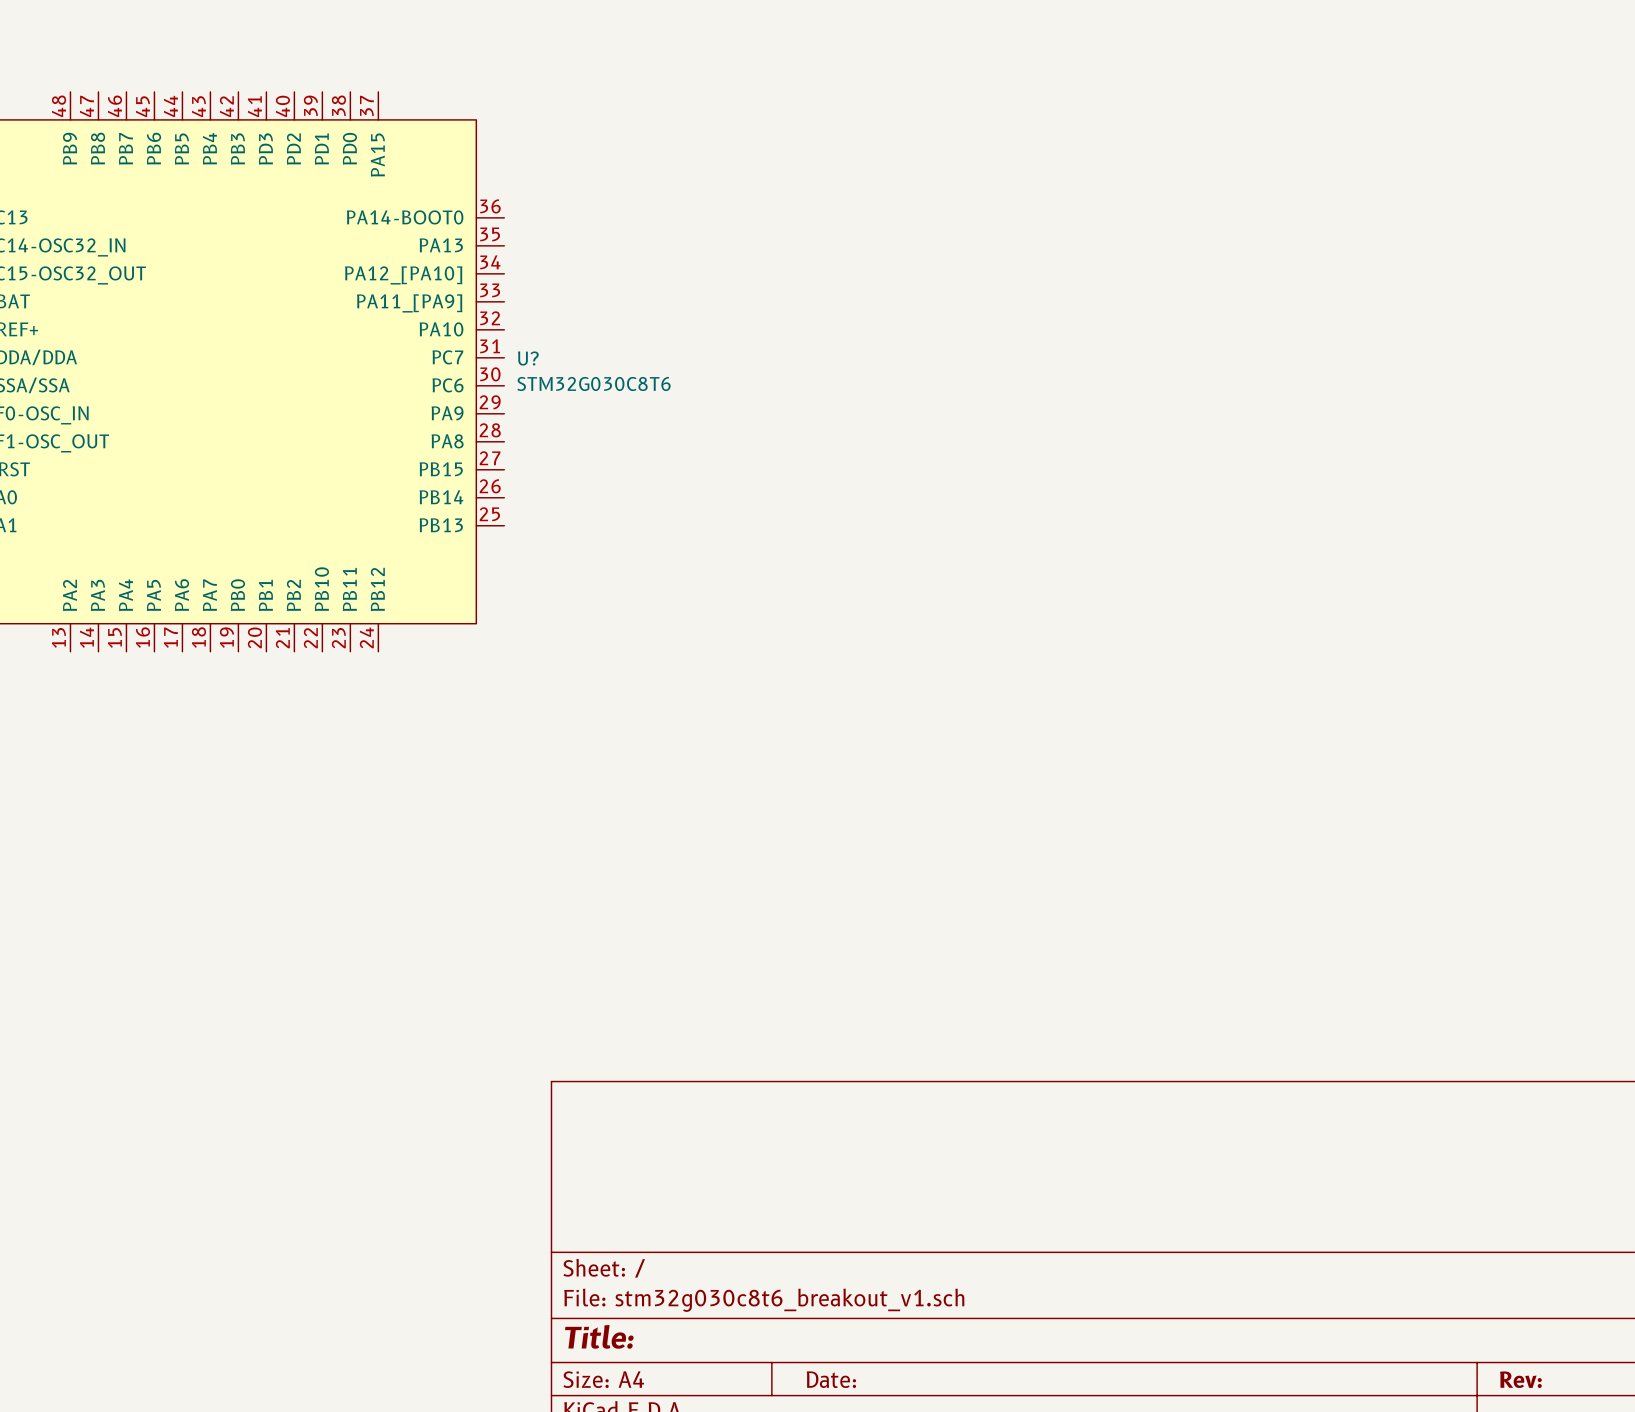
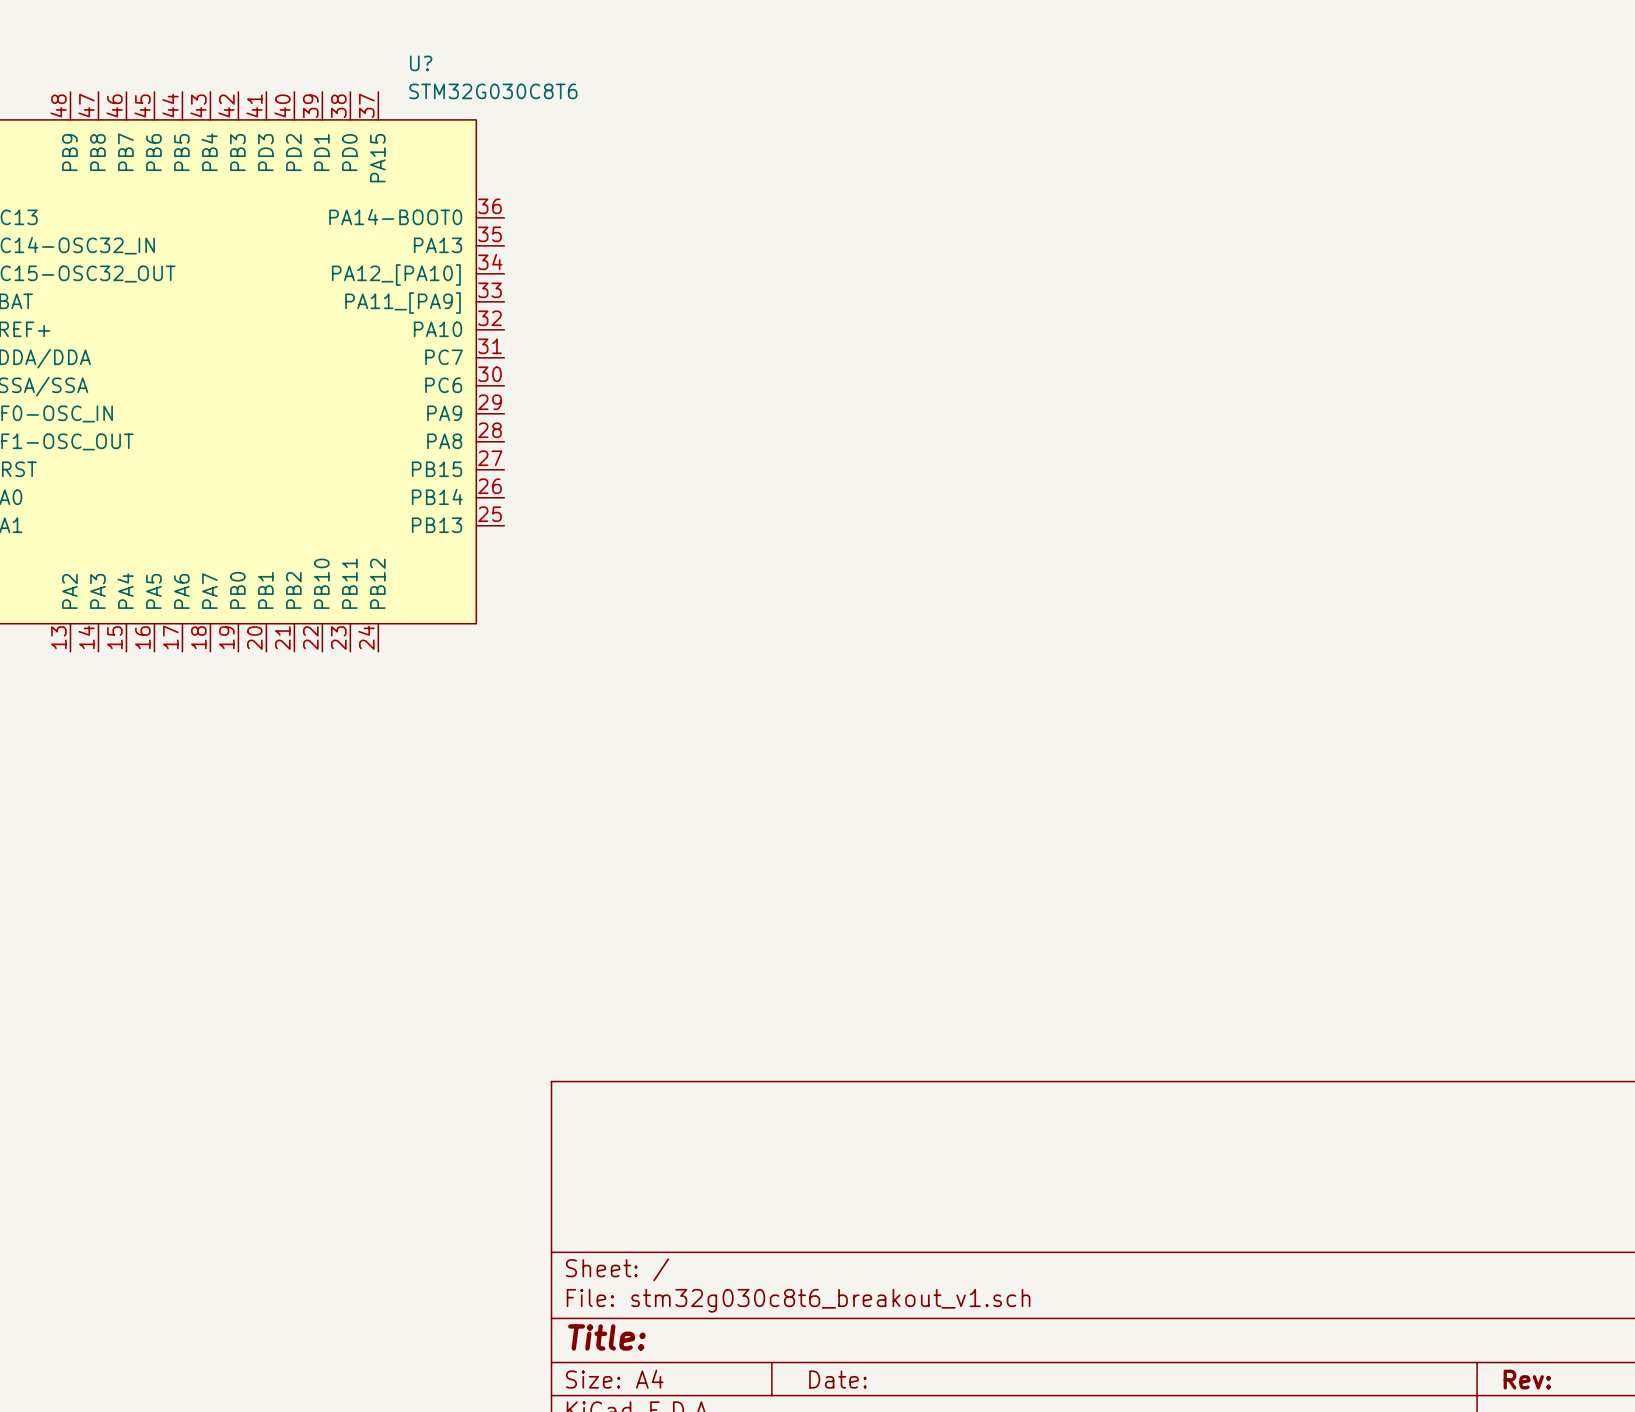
U? name position: U? (528, 358) -> U? (421, 63)
U? value position: STM32G030C8T6 (594, 383) -> STM32G030C8T6 (493, 91)

